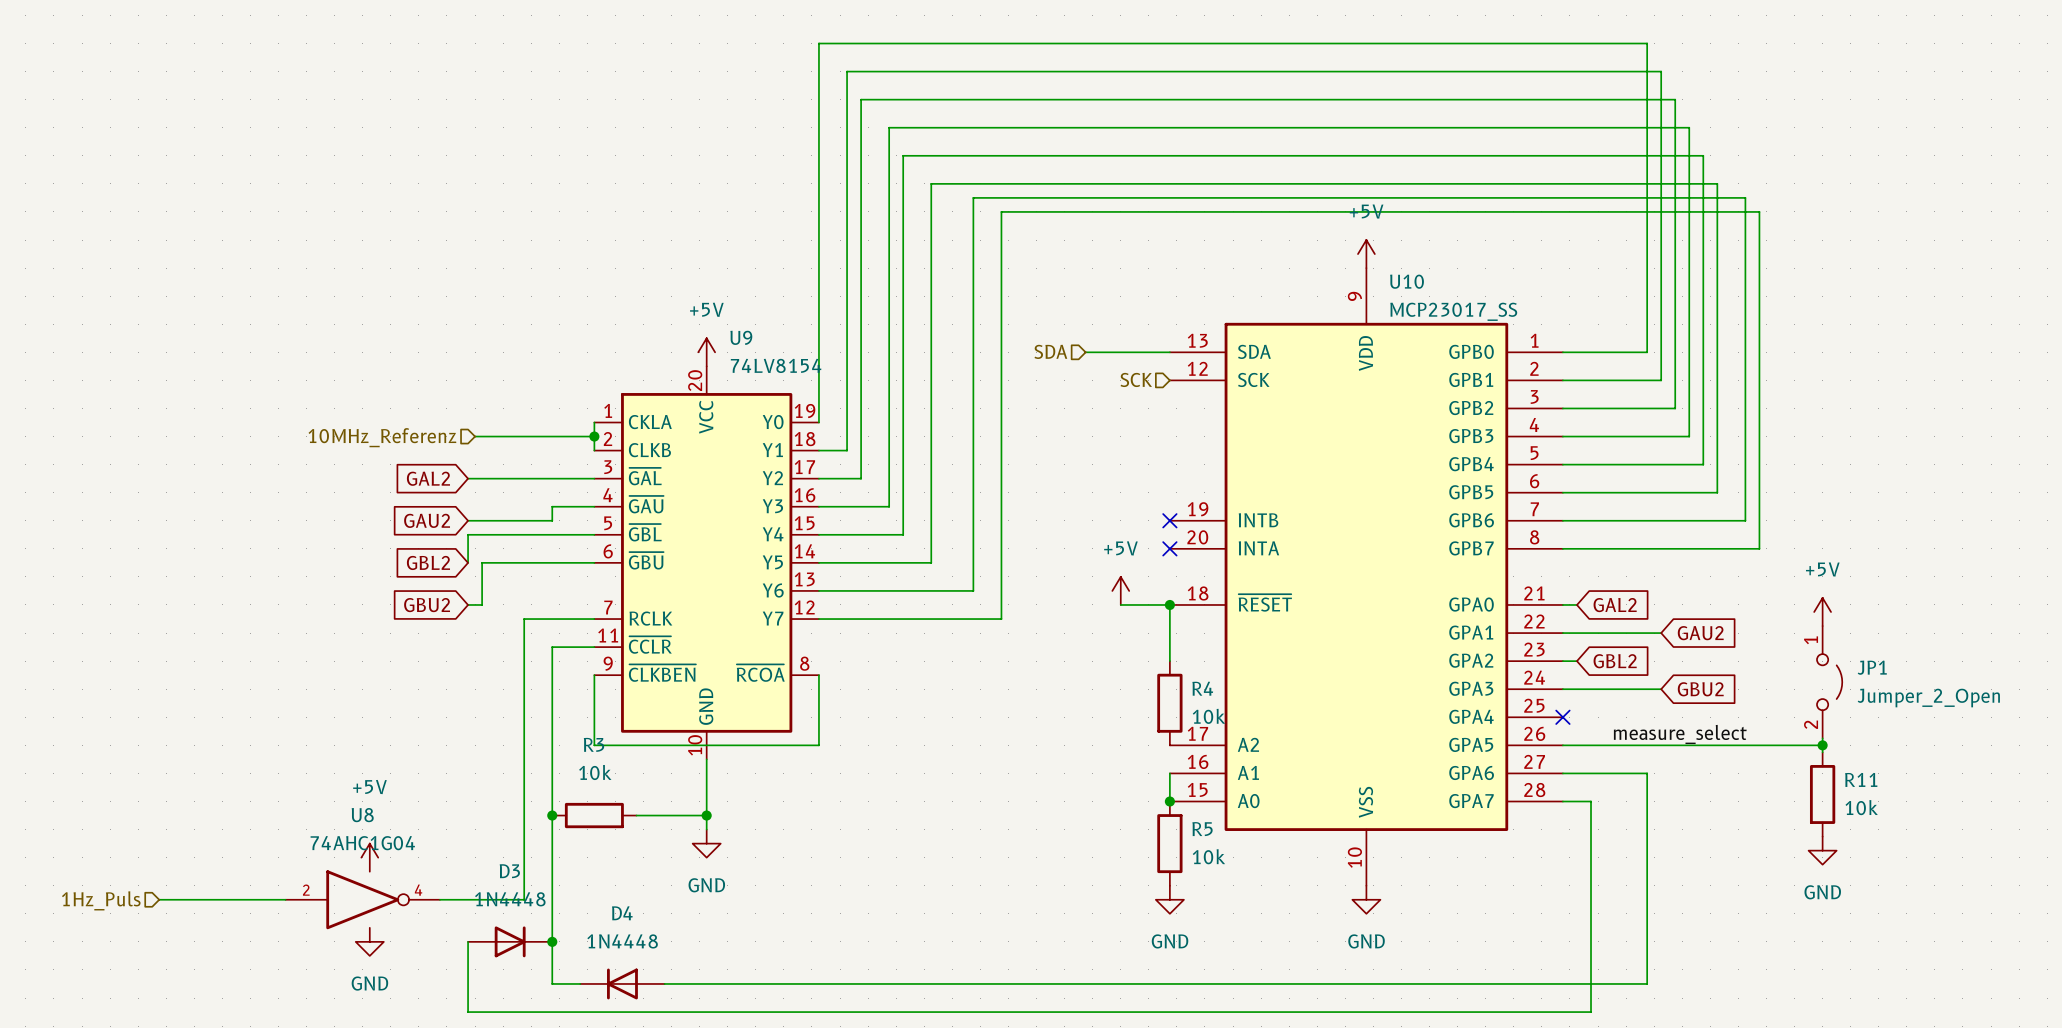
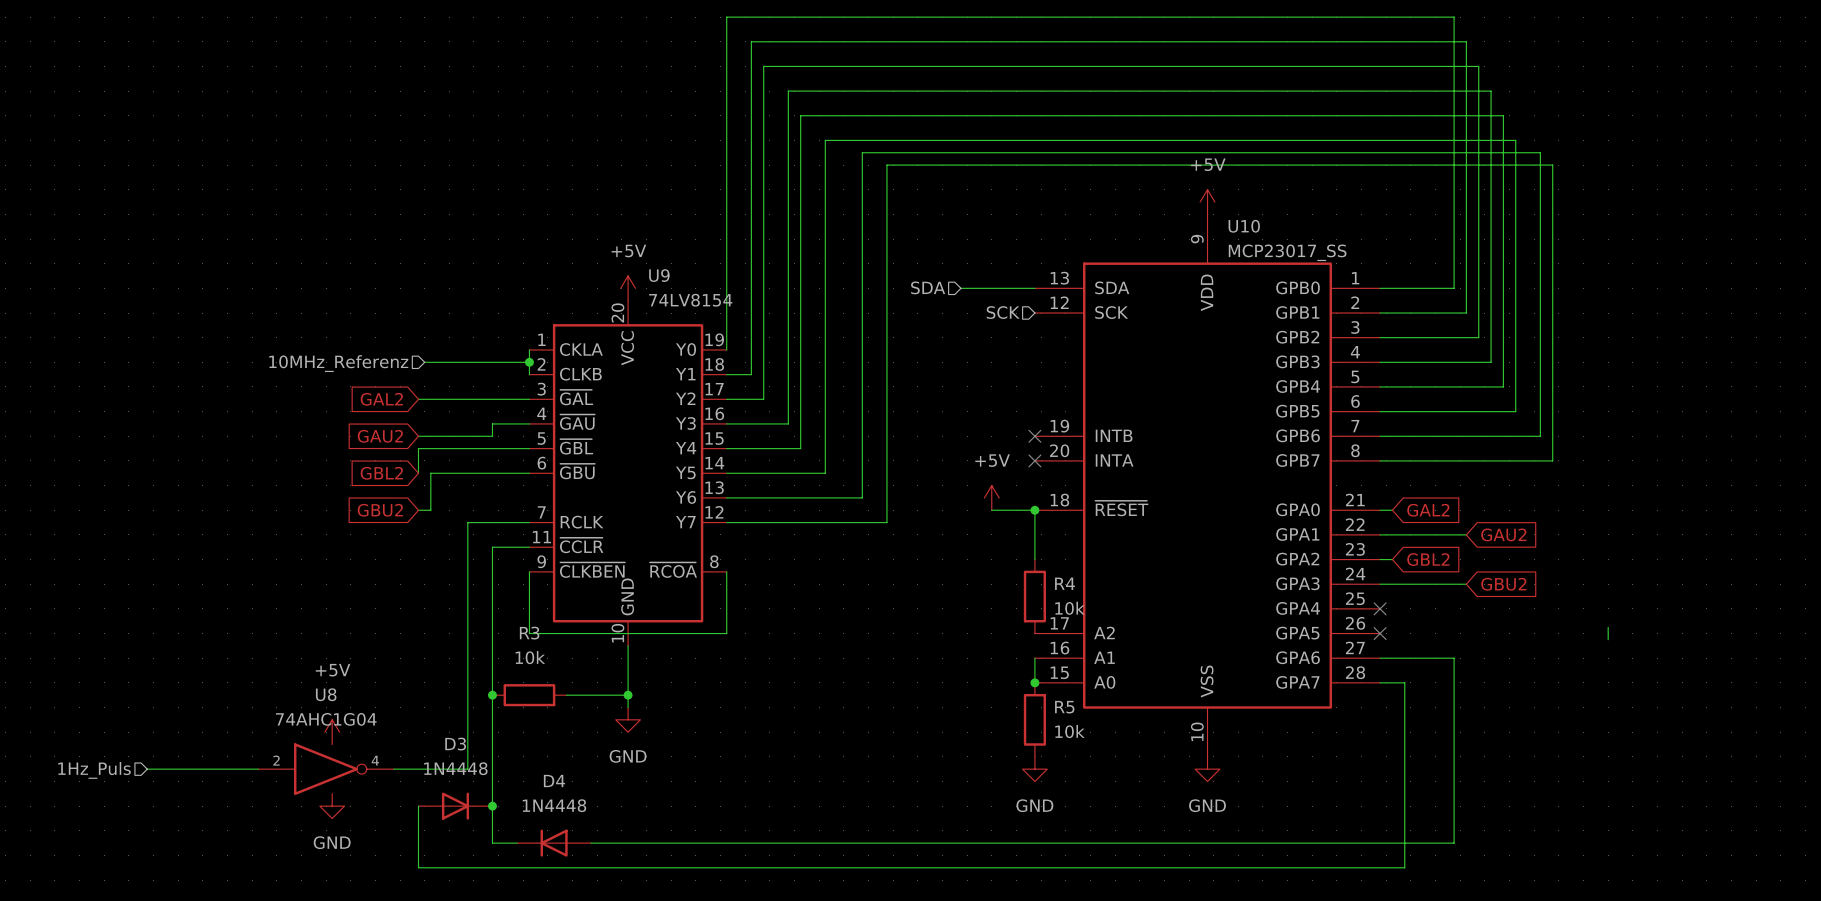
power symbol: +5V (1822, 612) -> none
JP1: Jumper_2_Open (1829, 682) -> none
label: measure_select (1680, 734) -> none
wire: (1562, 745) (1822, 745) -> none
no-connect mark: none -> (1380, 633)
junction: (1822, 745) -> none
R11: 10k (1822, 794) -> none
power symbol: GND (1822, 850) -> none

